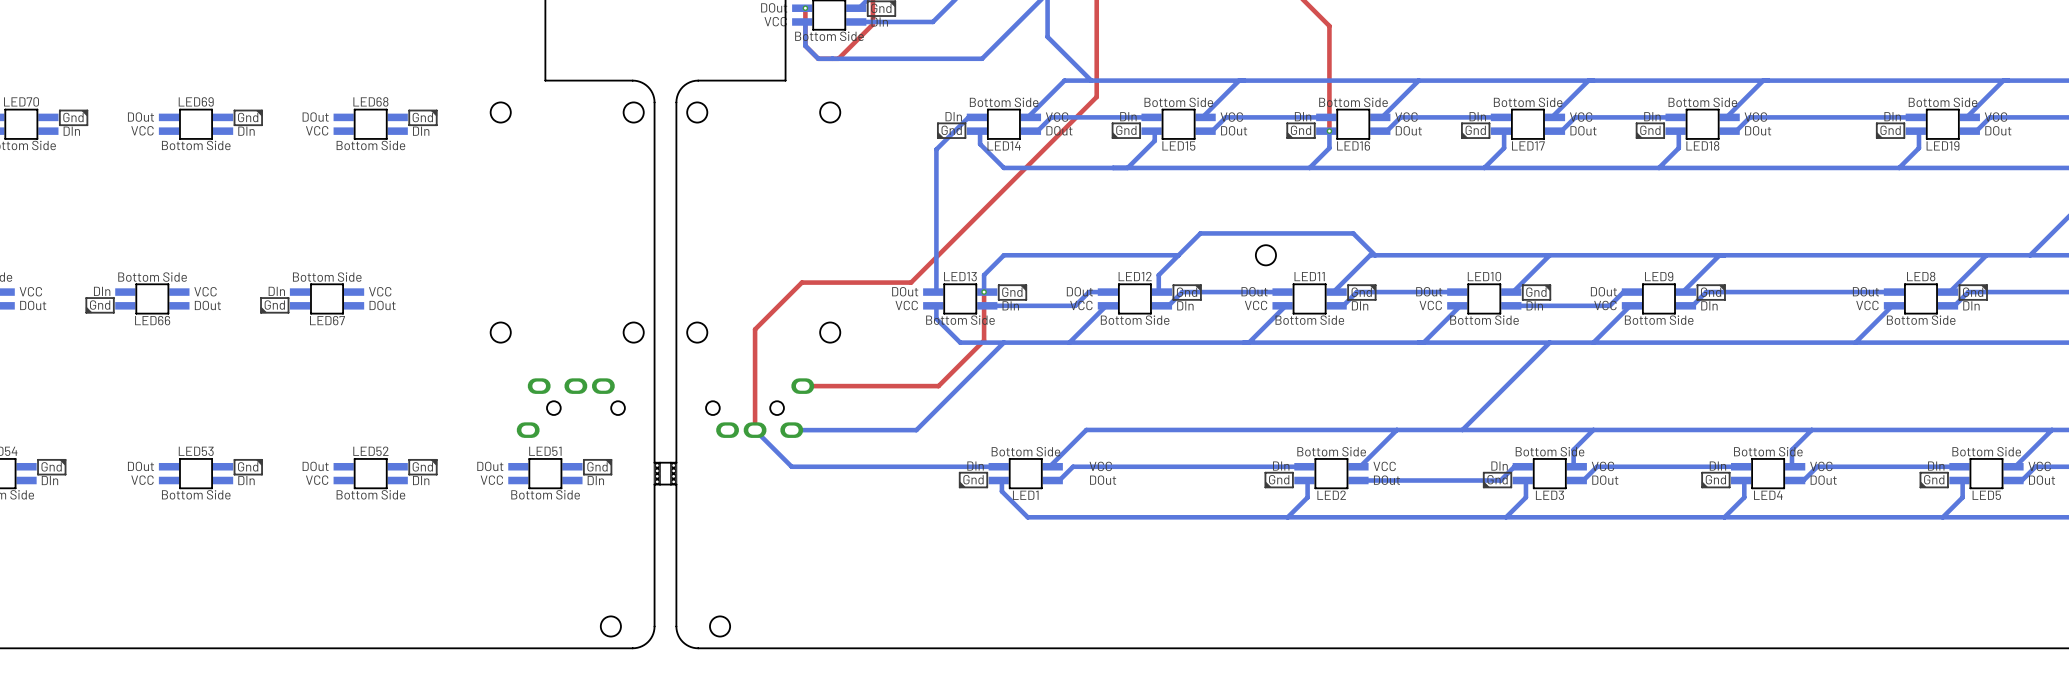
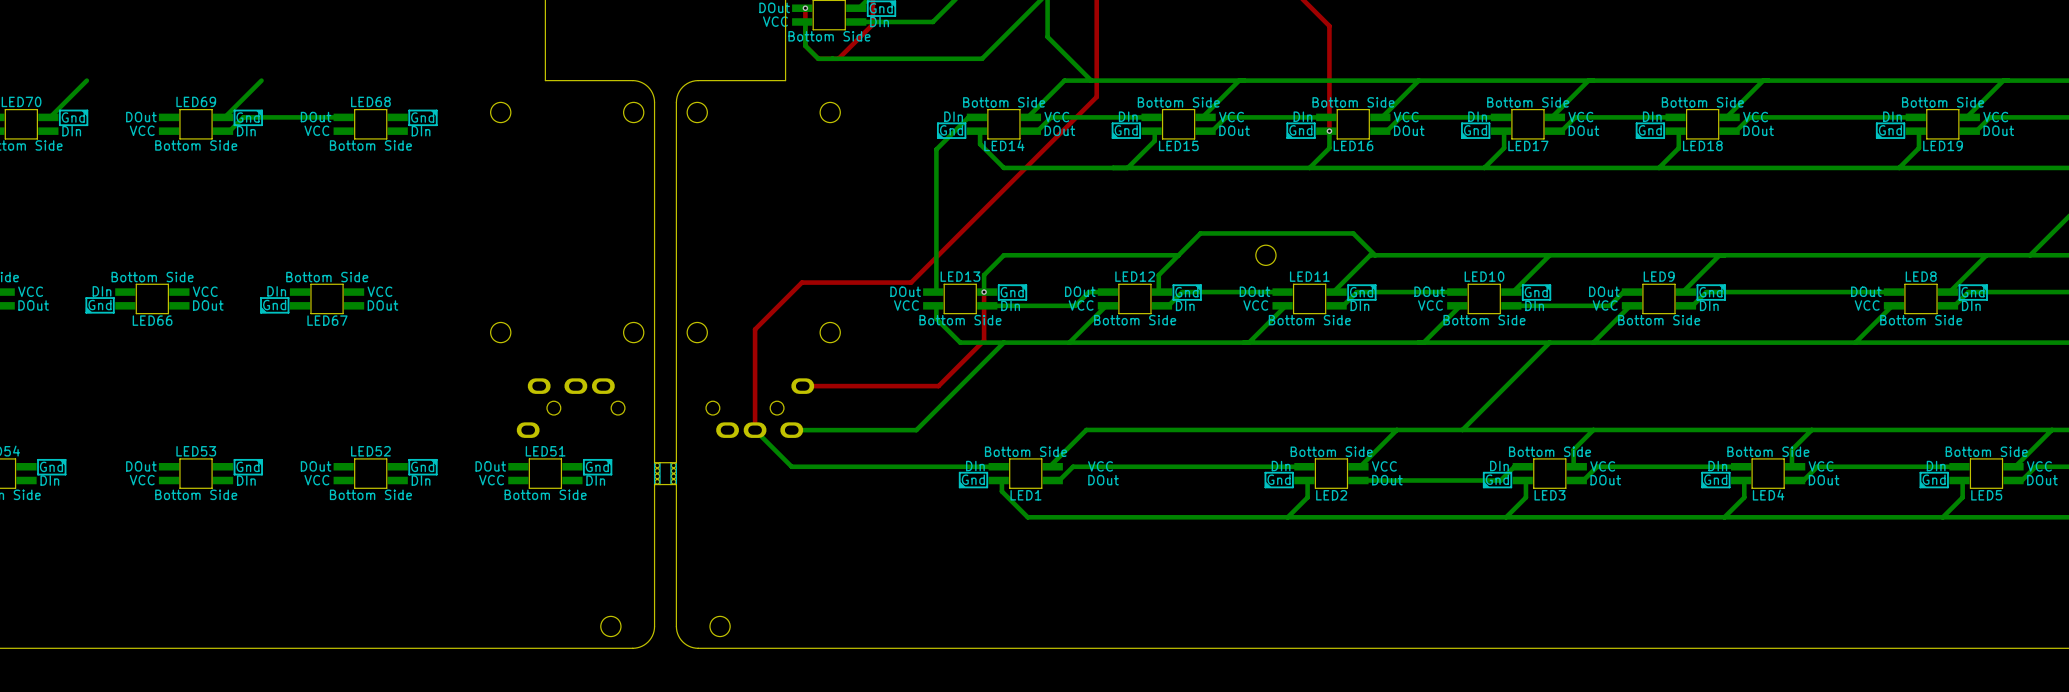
bottom track: none -> (86, 80) (50, 117) (45, 117)
bottom track: none -> (261, 80) (224, 117) (219, 117)
bottom track: none -> (346, 117) (243, 117) (229, 131) (219, 131)

